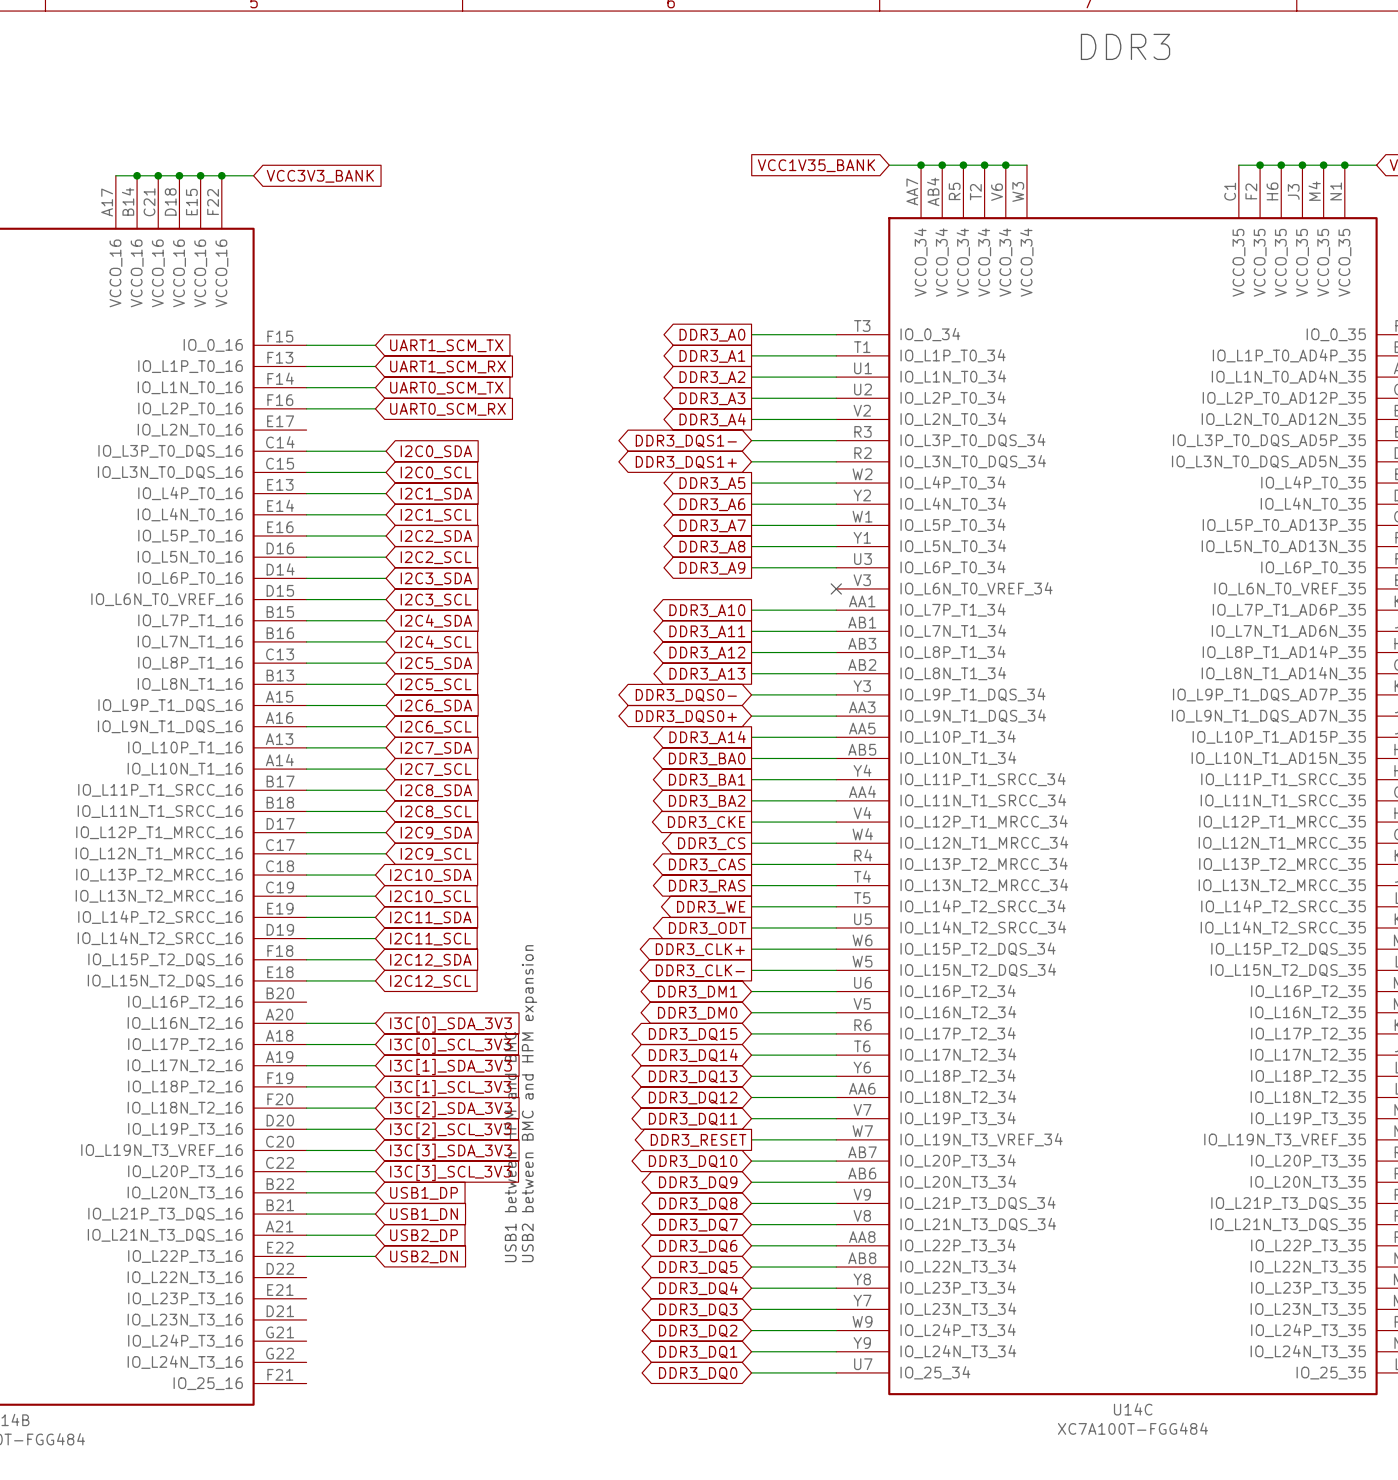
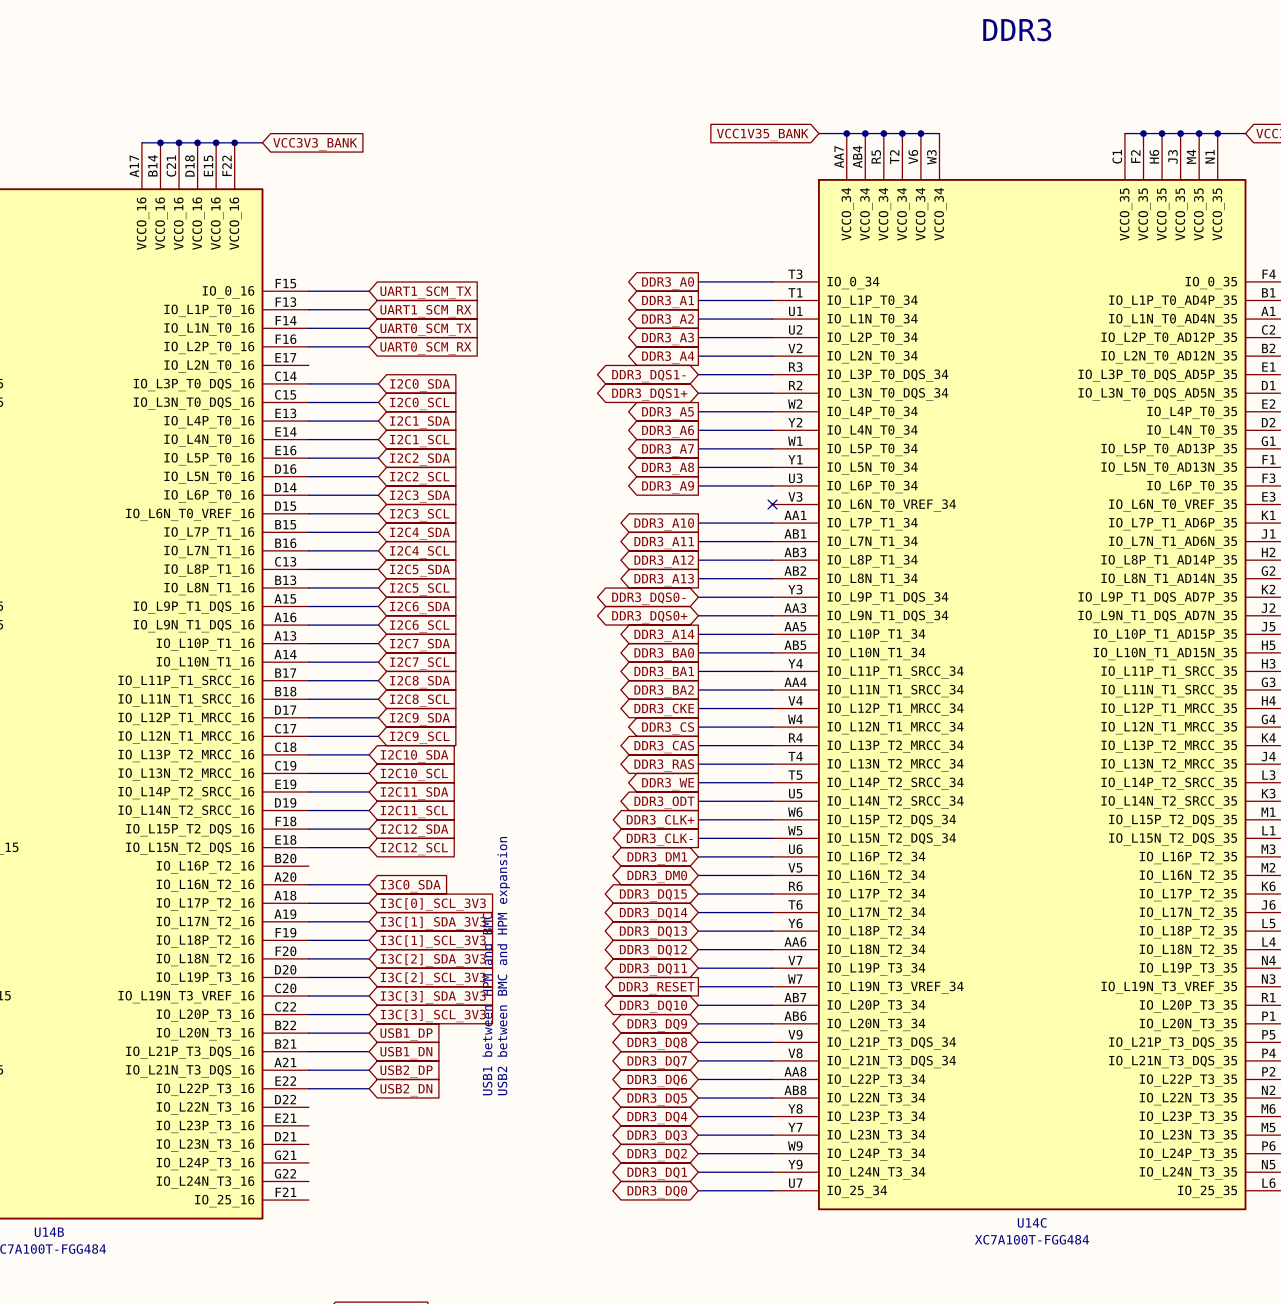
global label: I3C[0]_SDA_3V3 (450, 1024) -> I3C0_SDA (410, 886)

